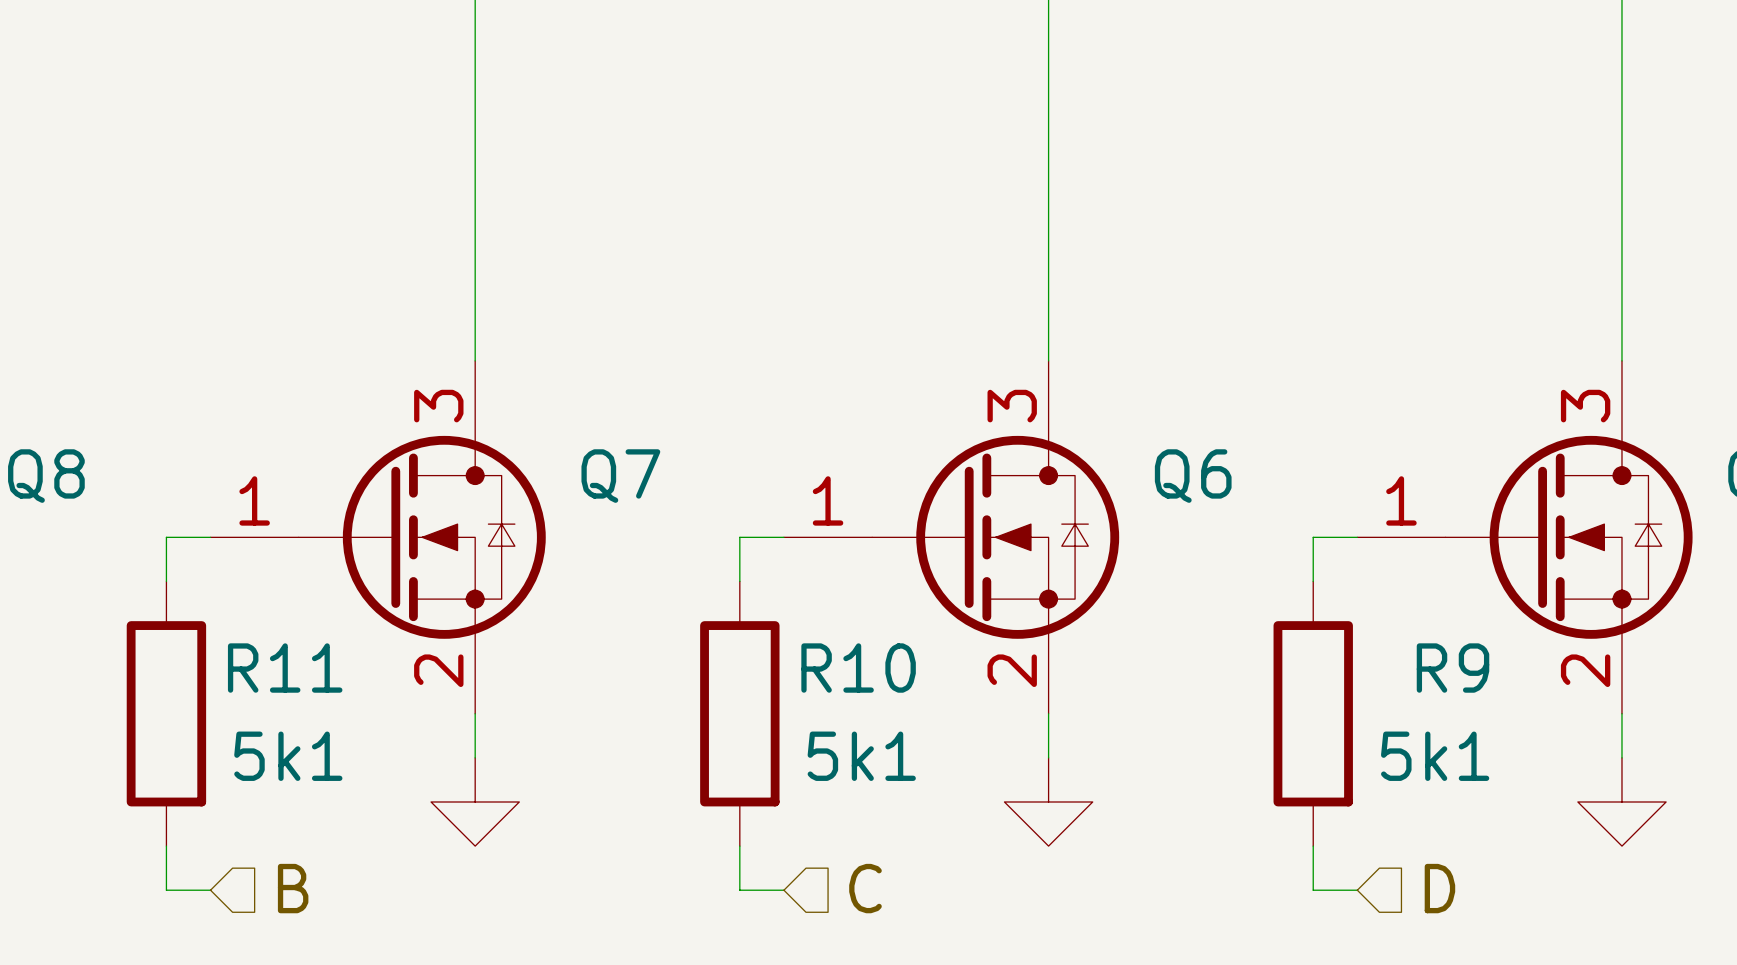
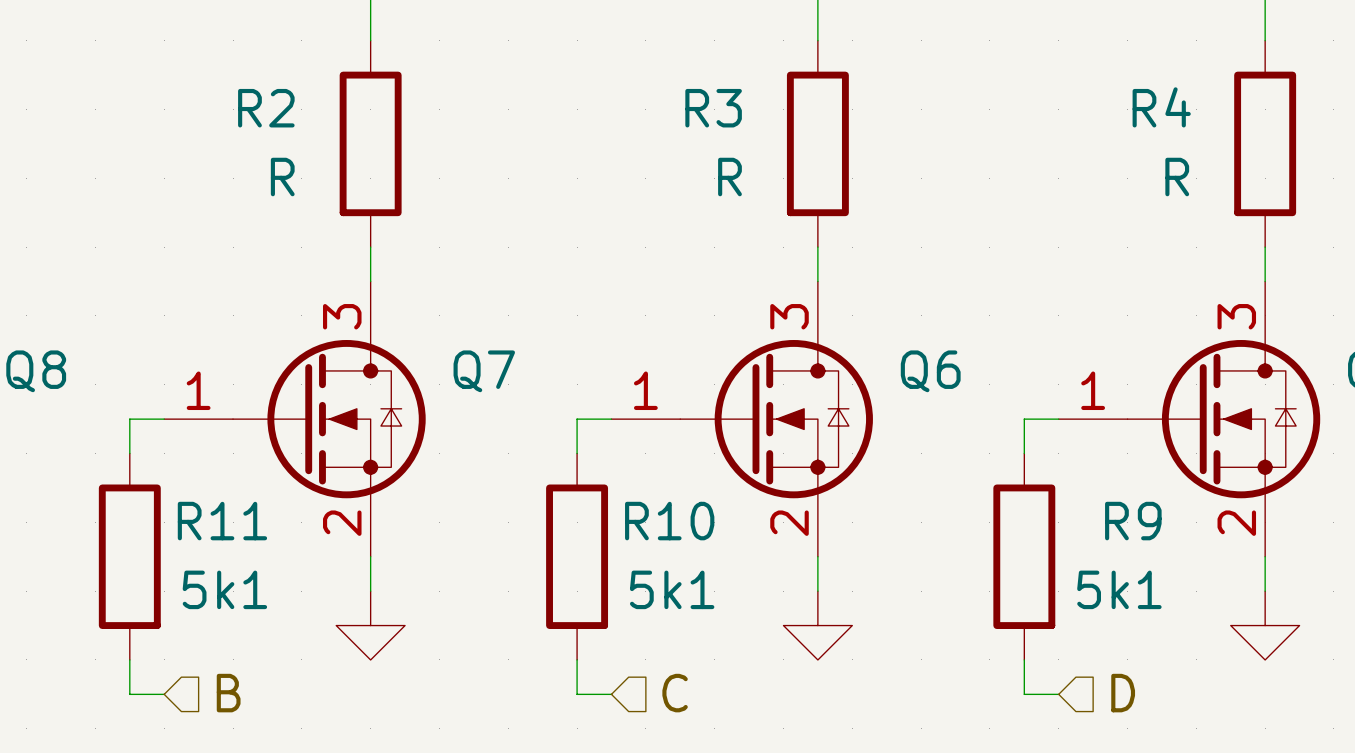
wire: (475, 52) (475, 316) -> none
wire: (1048, 52) (1048, 316) -> none
wire: (1621, 52) (1621, 316) -> none
R2: none -> R (370, 143)
R3: none -> R (817, 143)
R4: none -> R (1265, 143)

